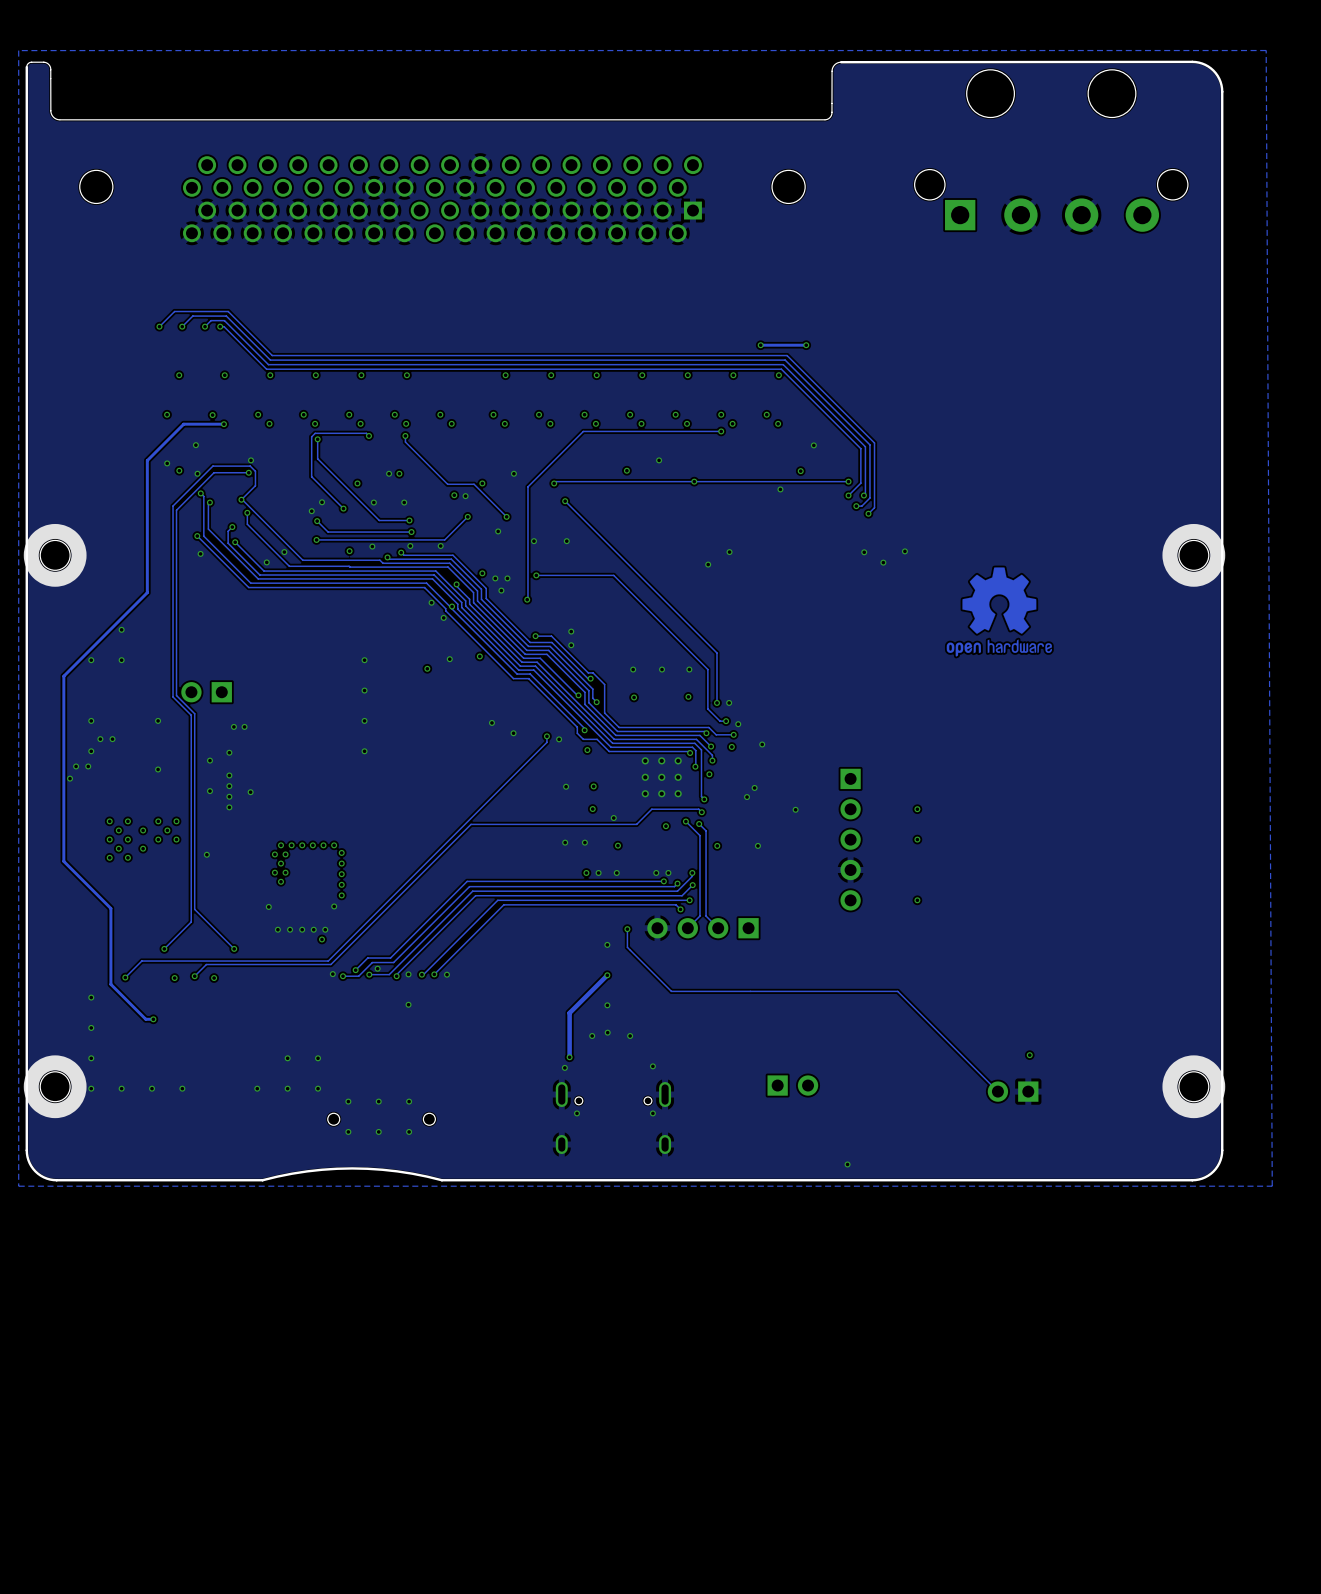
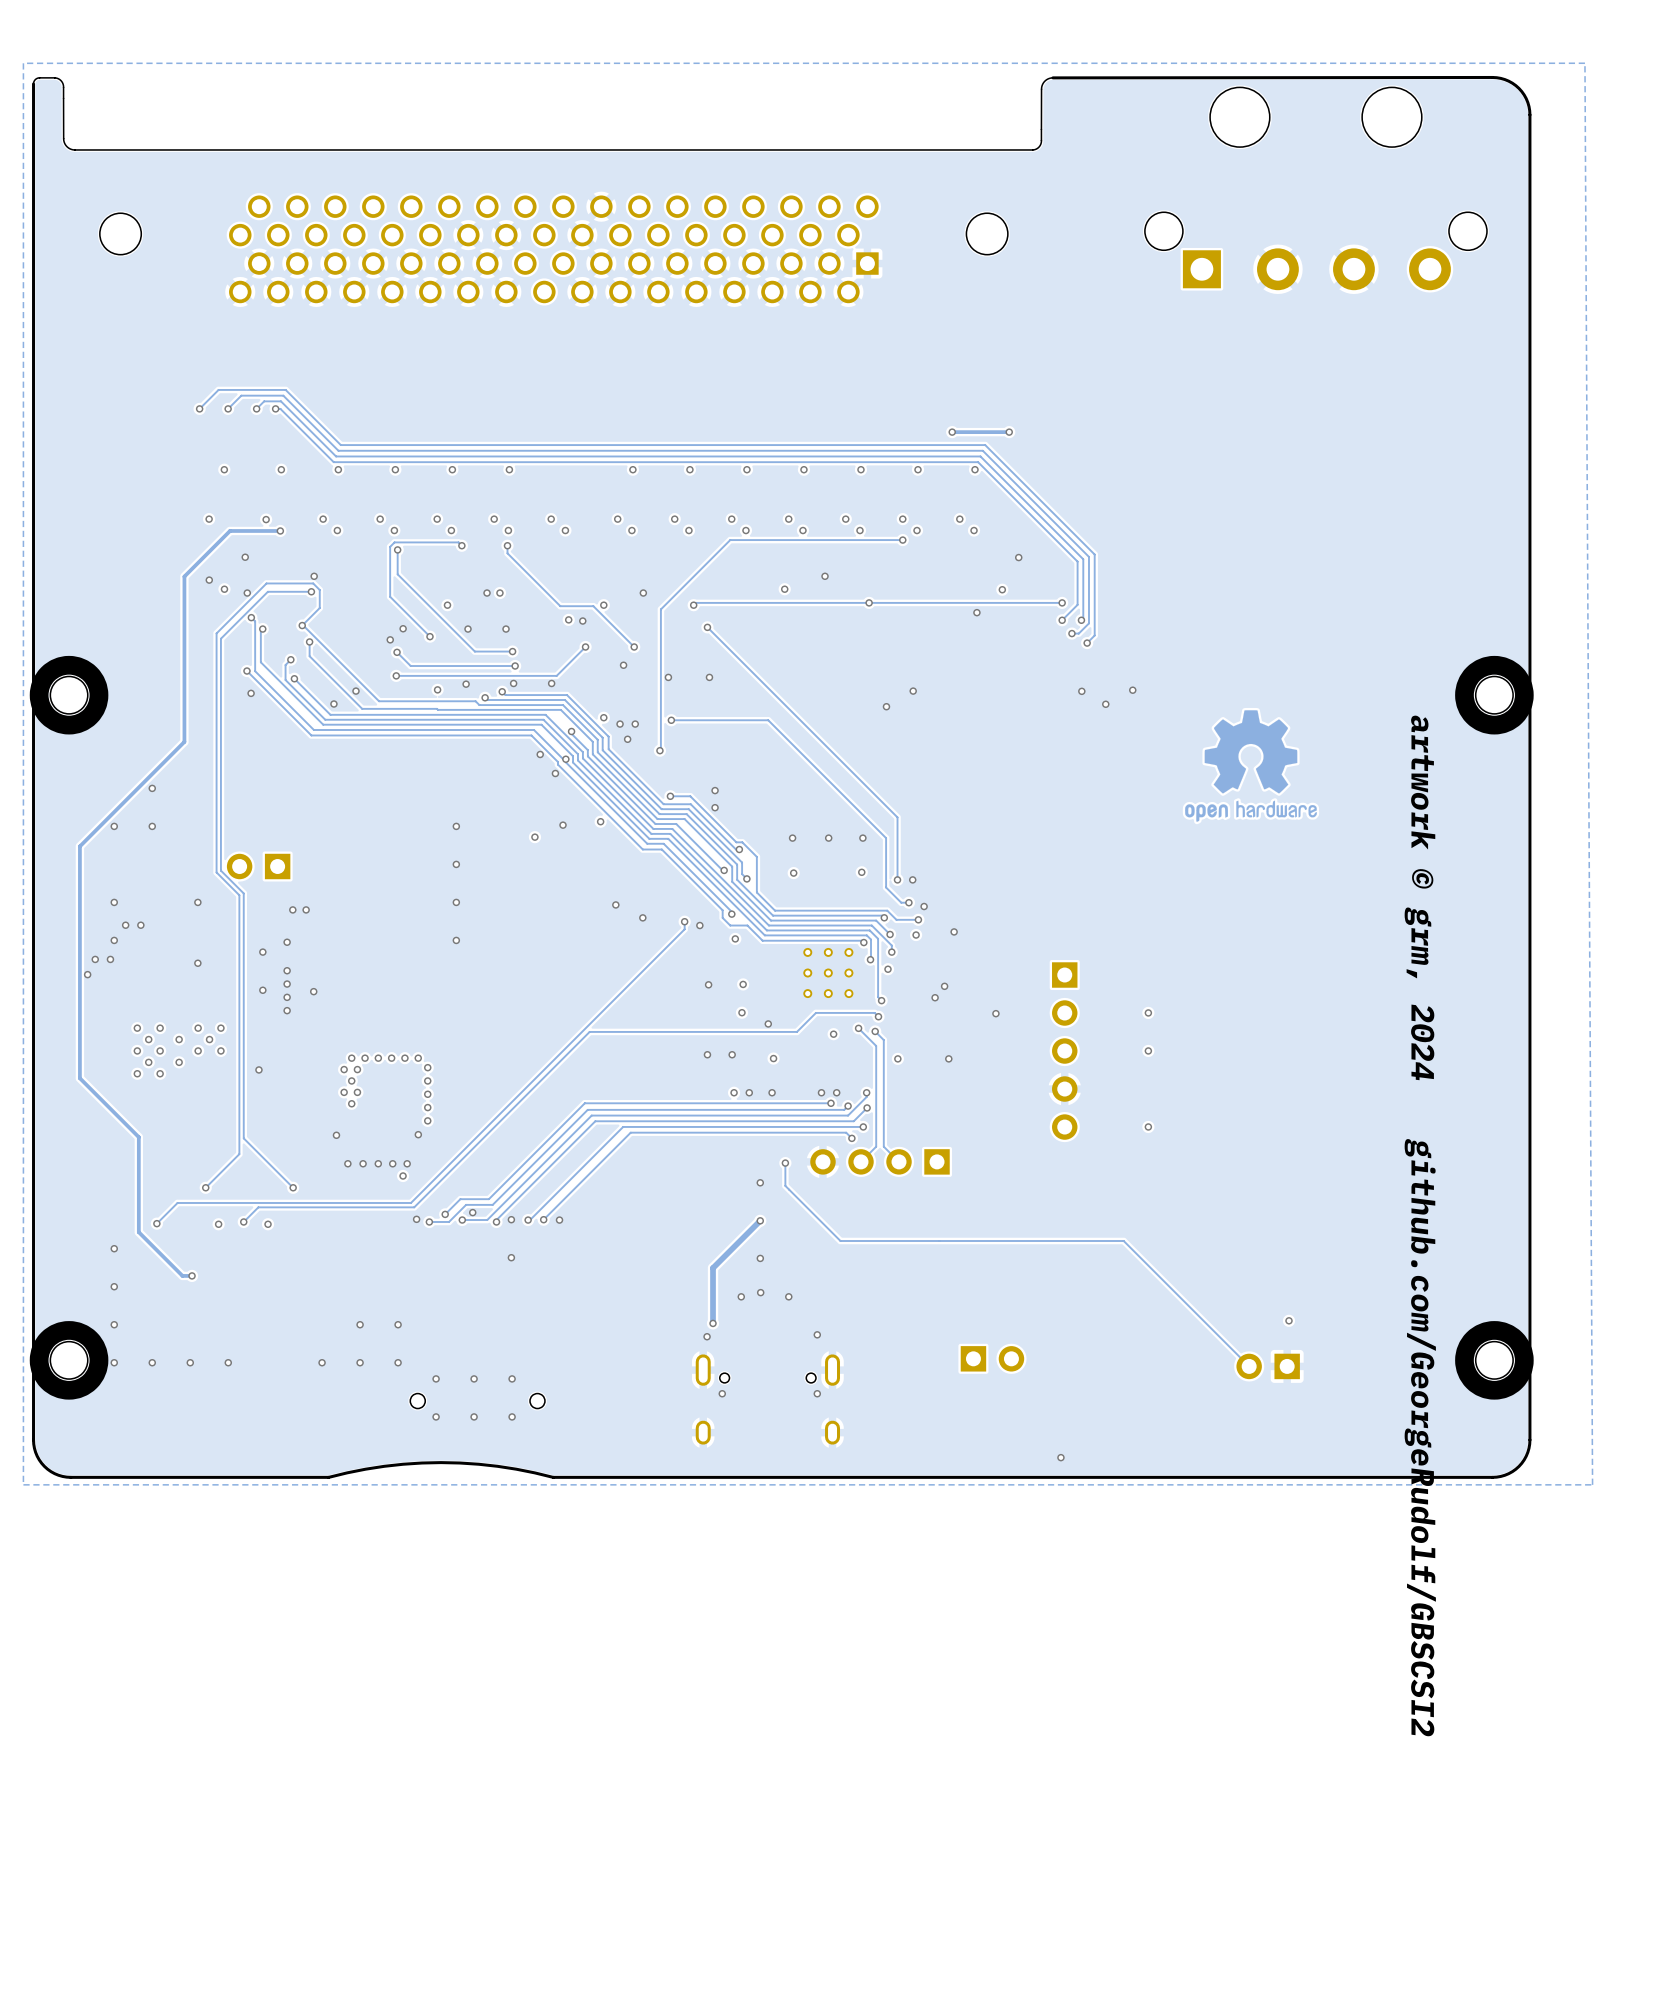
text: none -> artwork © grm, 2024 github.com/GeorgeRudolf/GBSCSI2 (1420, 1225)

